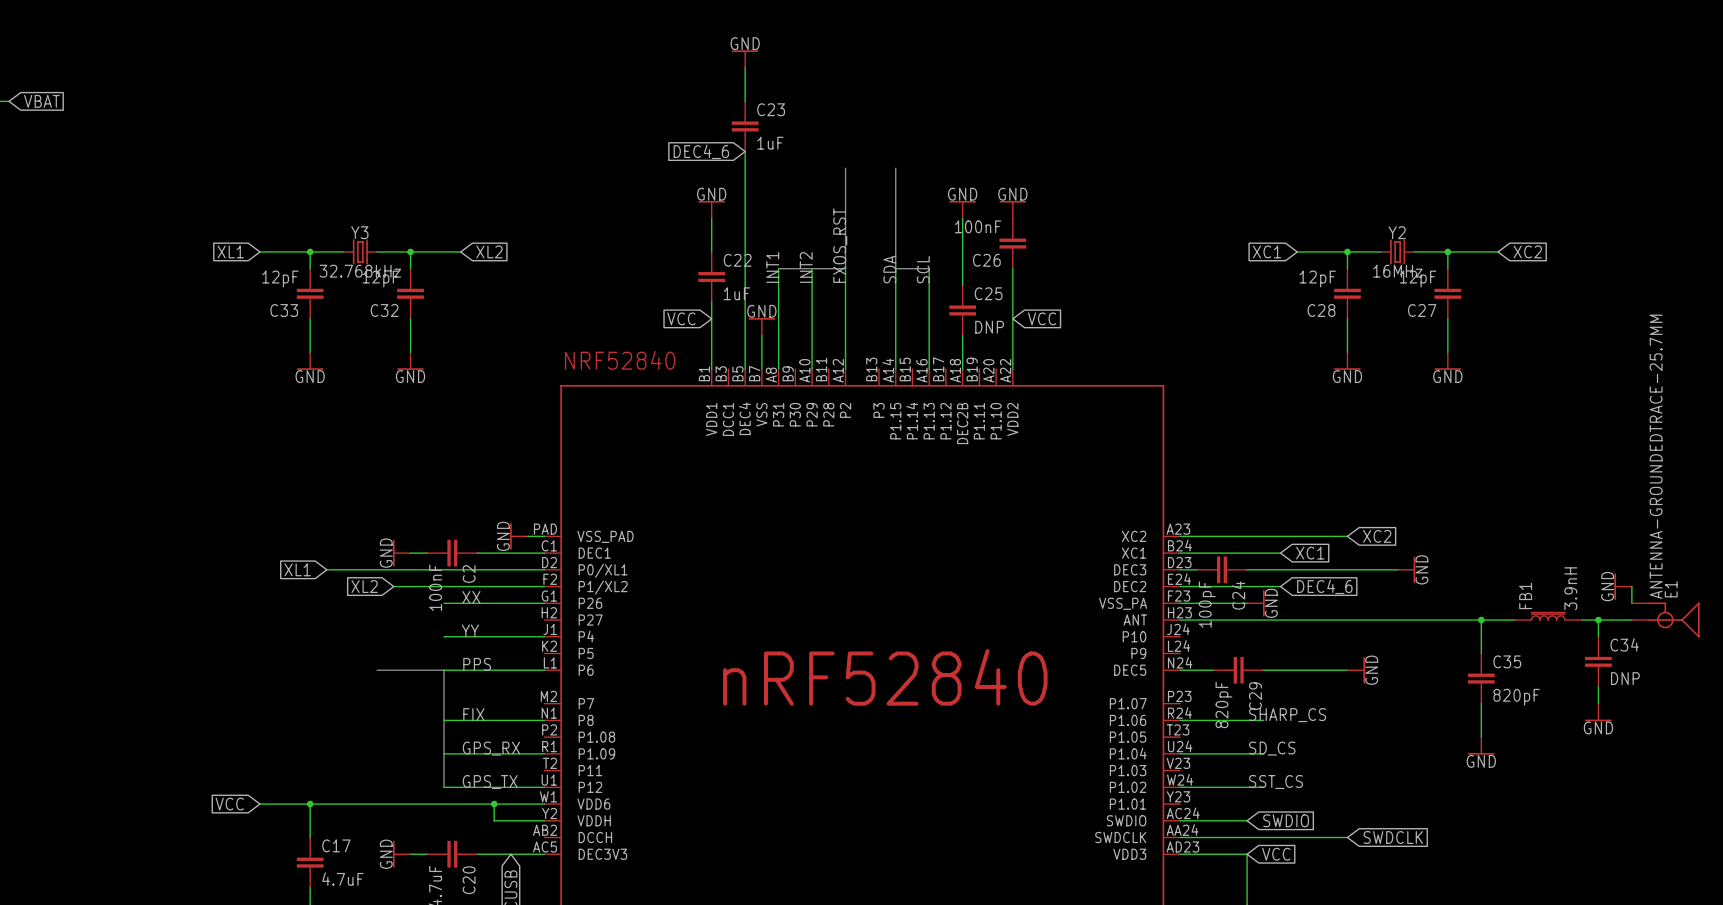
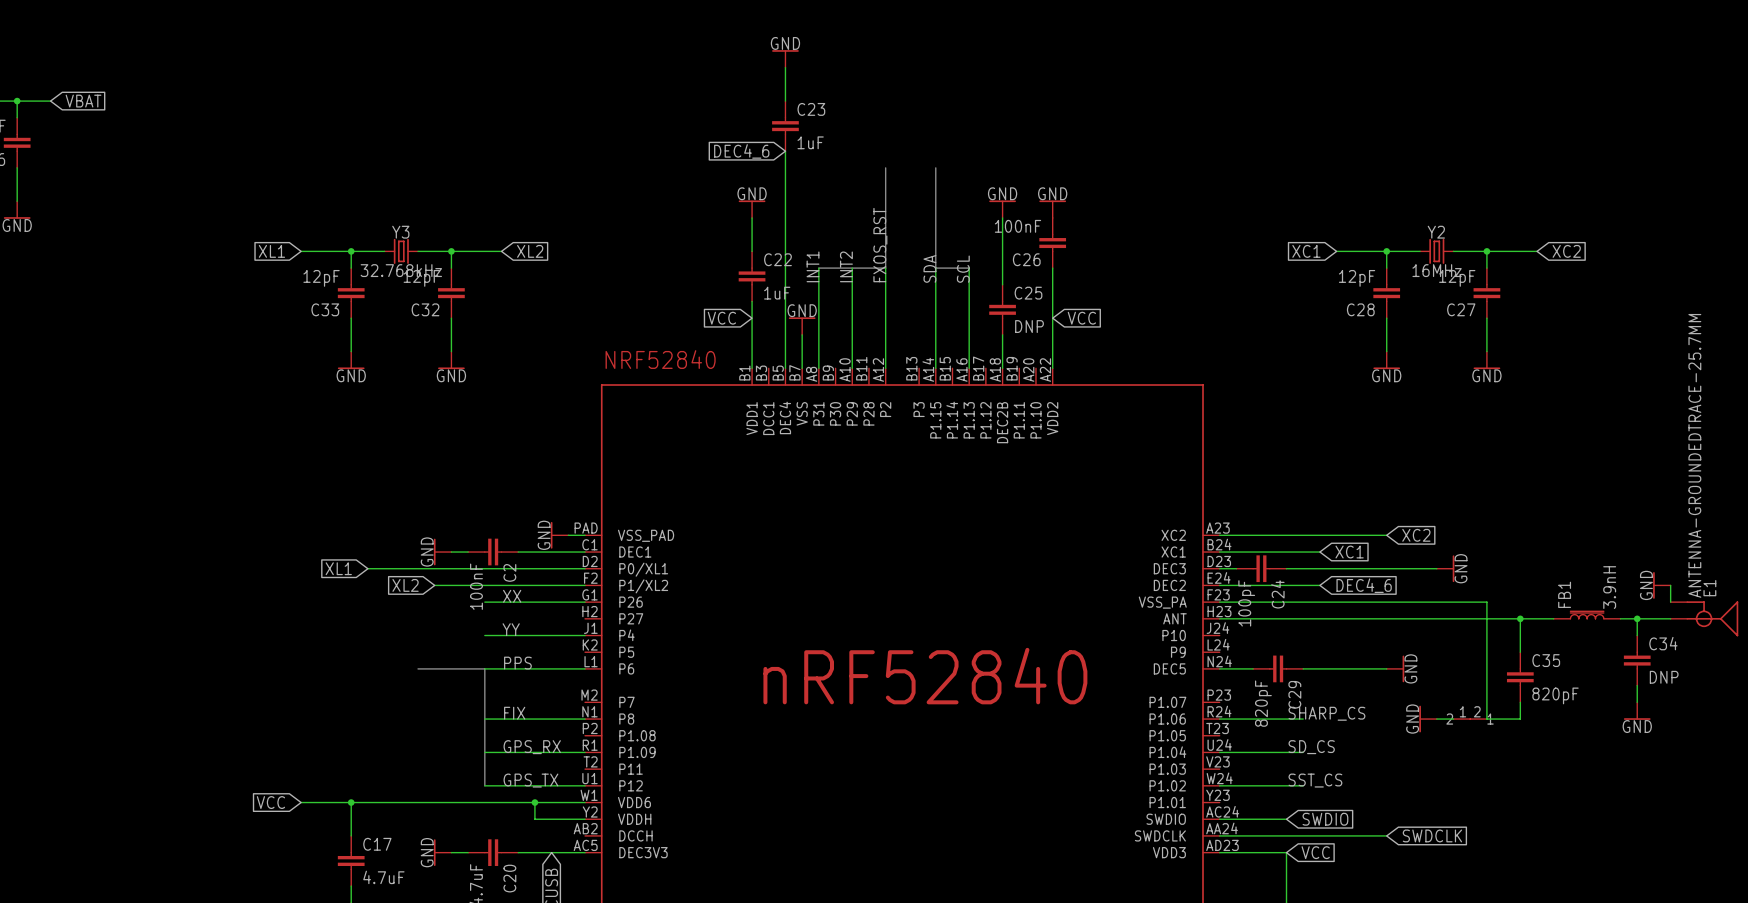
power symbol: GND (1255, 603) -> none
power symbol: none -> GND (1428, 719)
wire: none -> (1436, 719) (1453, 719)
part: none -> (1470, 719)
wire: (1481, 720) (1481, 737) -> (1520, 719) (1486, 719) (1486, 602) (1286, 602)
power symbol: GND (1481, 745) -> none

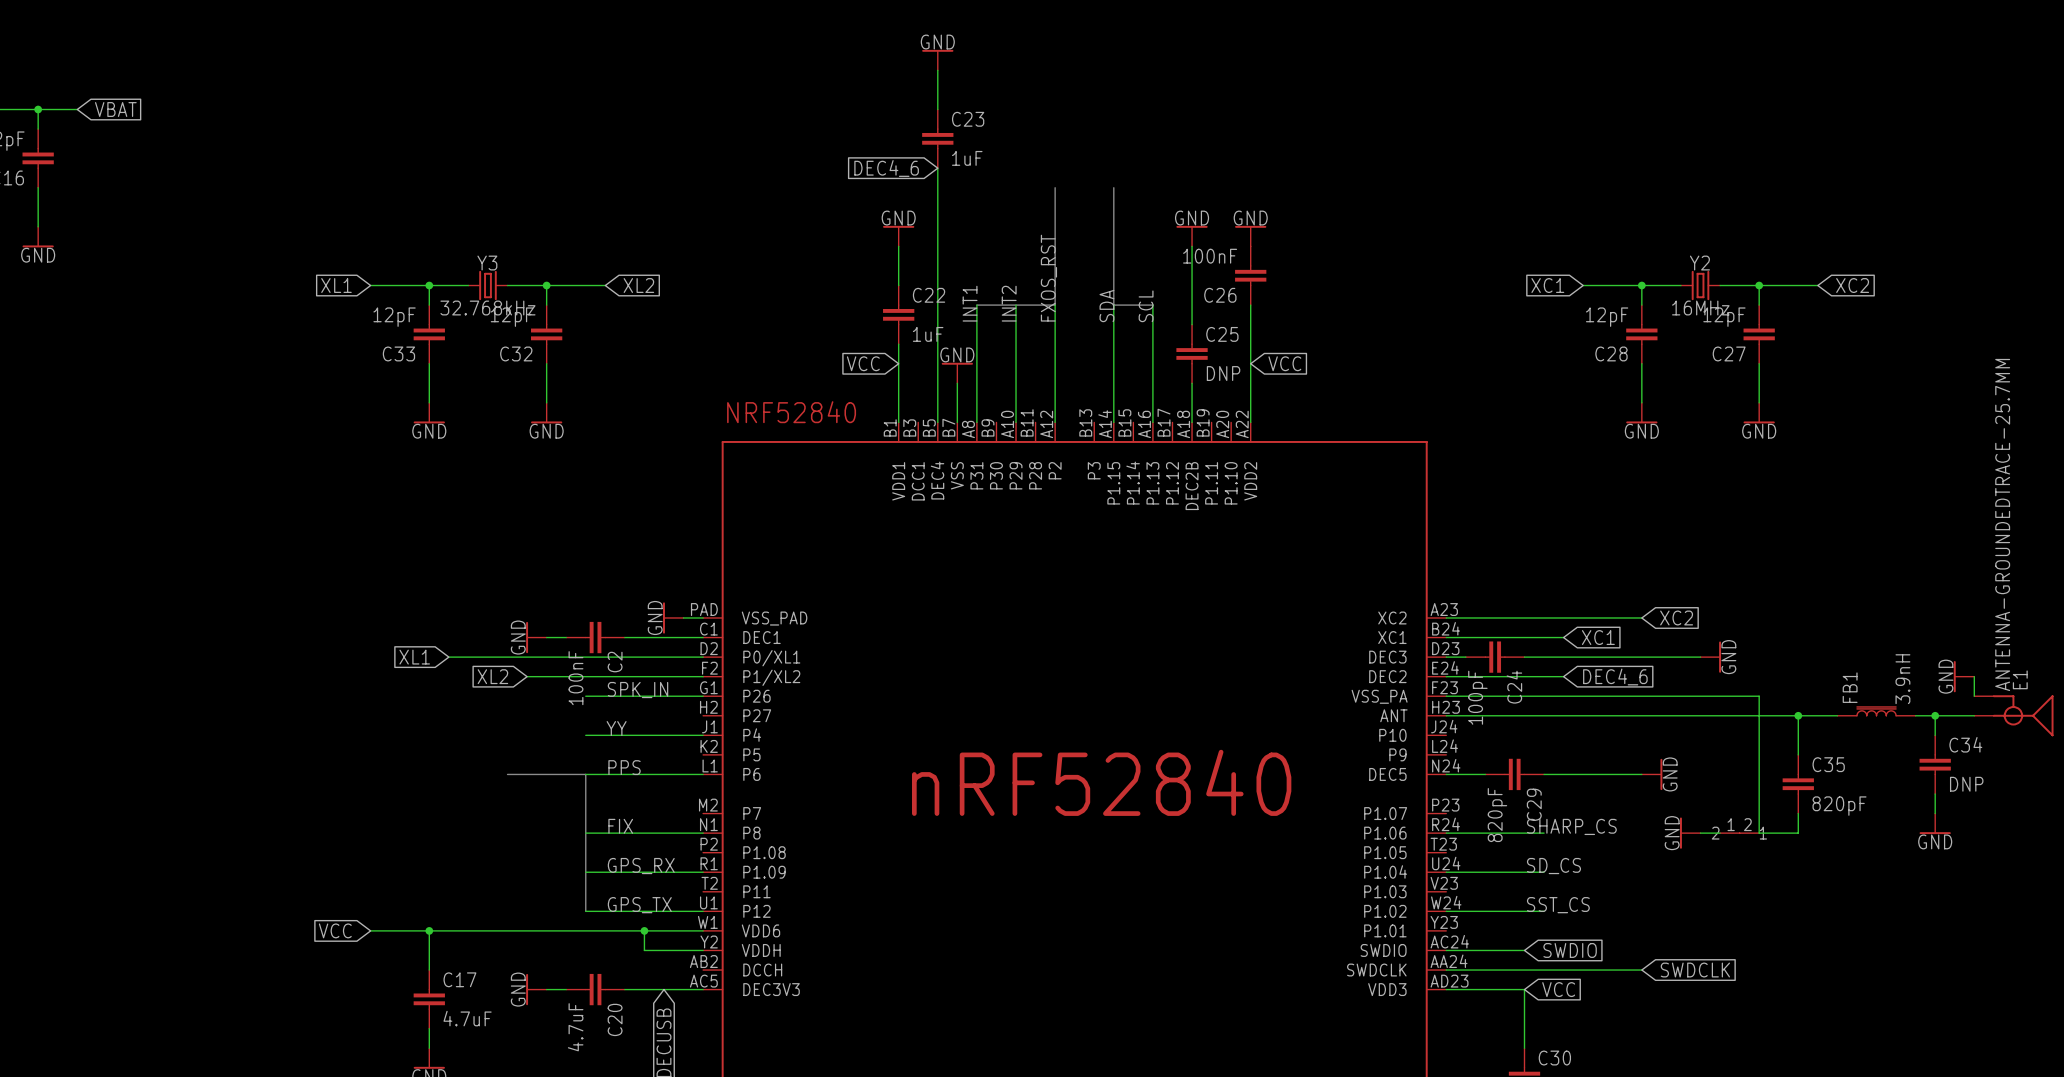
label: XX (512, 596) -> SPK_IN (638, 690)

